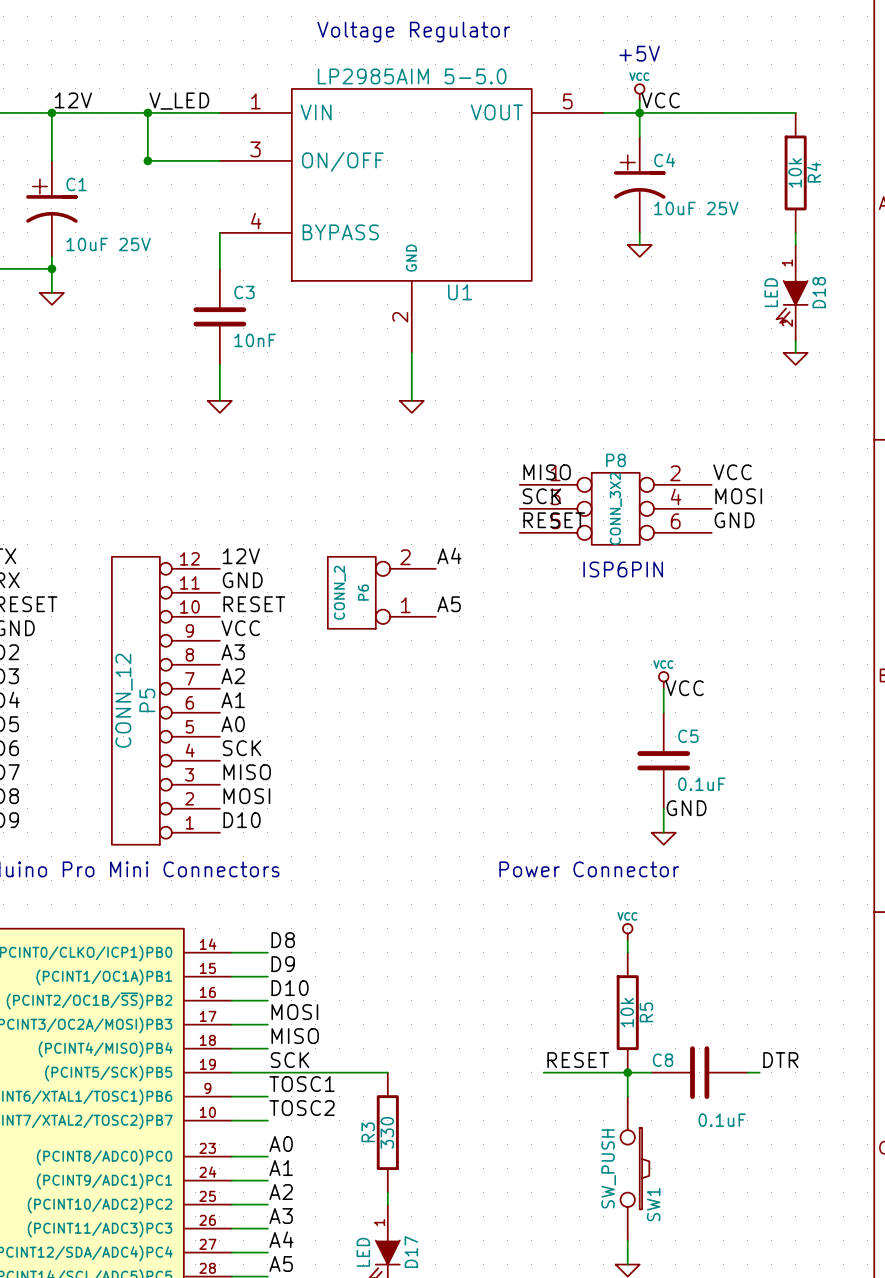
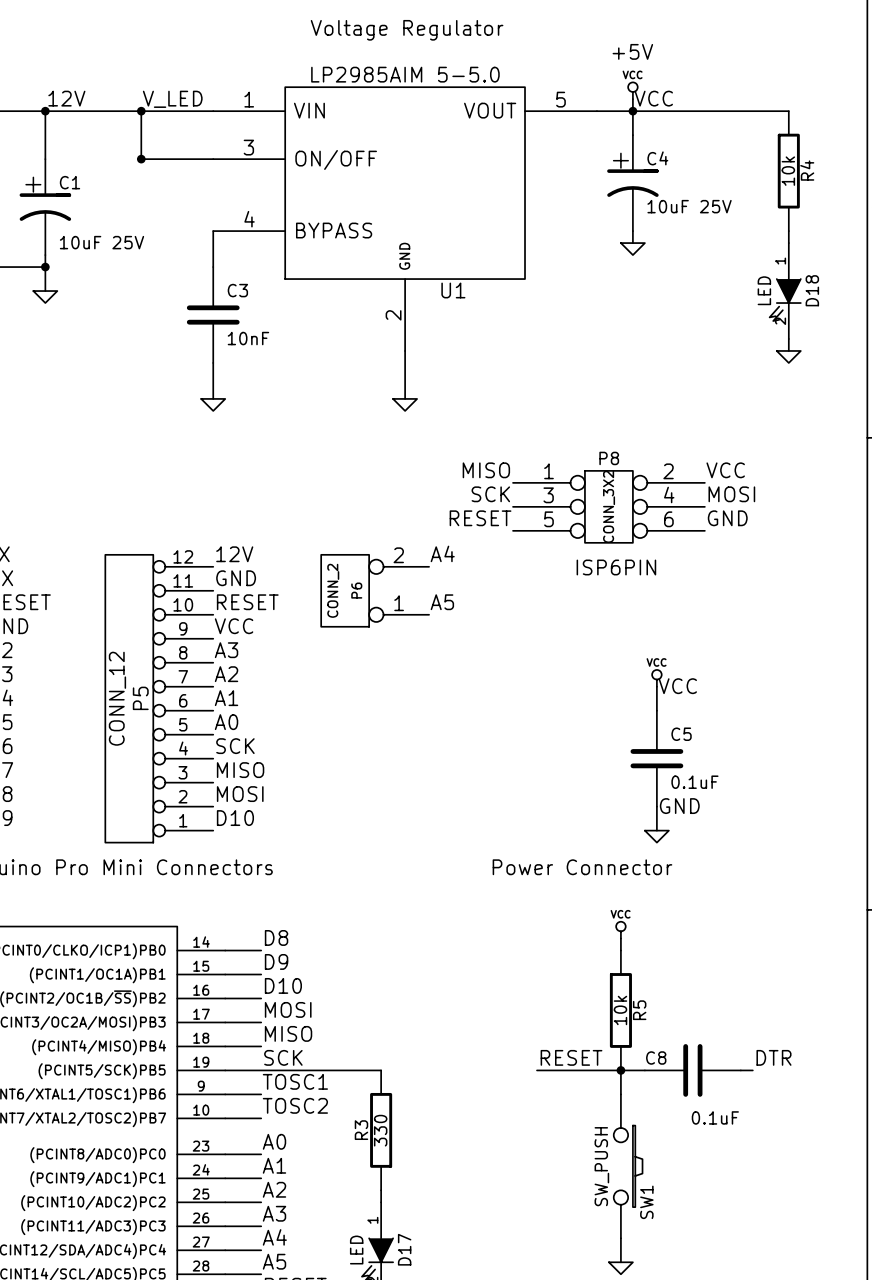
label position: MISO (547, 472) -> MISO (486, 470)
label position: SCK (541, 496) -> SCK (490, 494)
label position: RESET (554, 520) -> RESET (480, 518)

